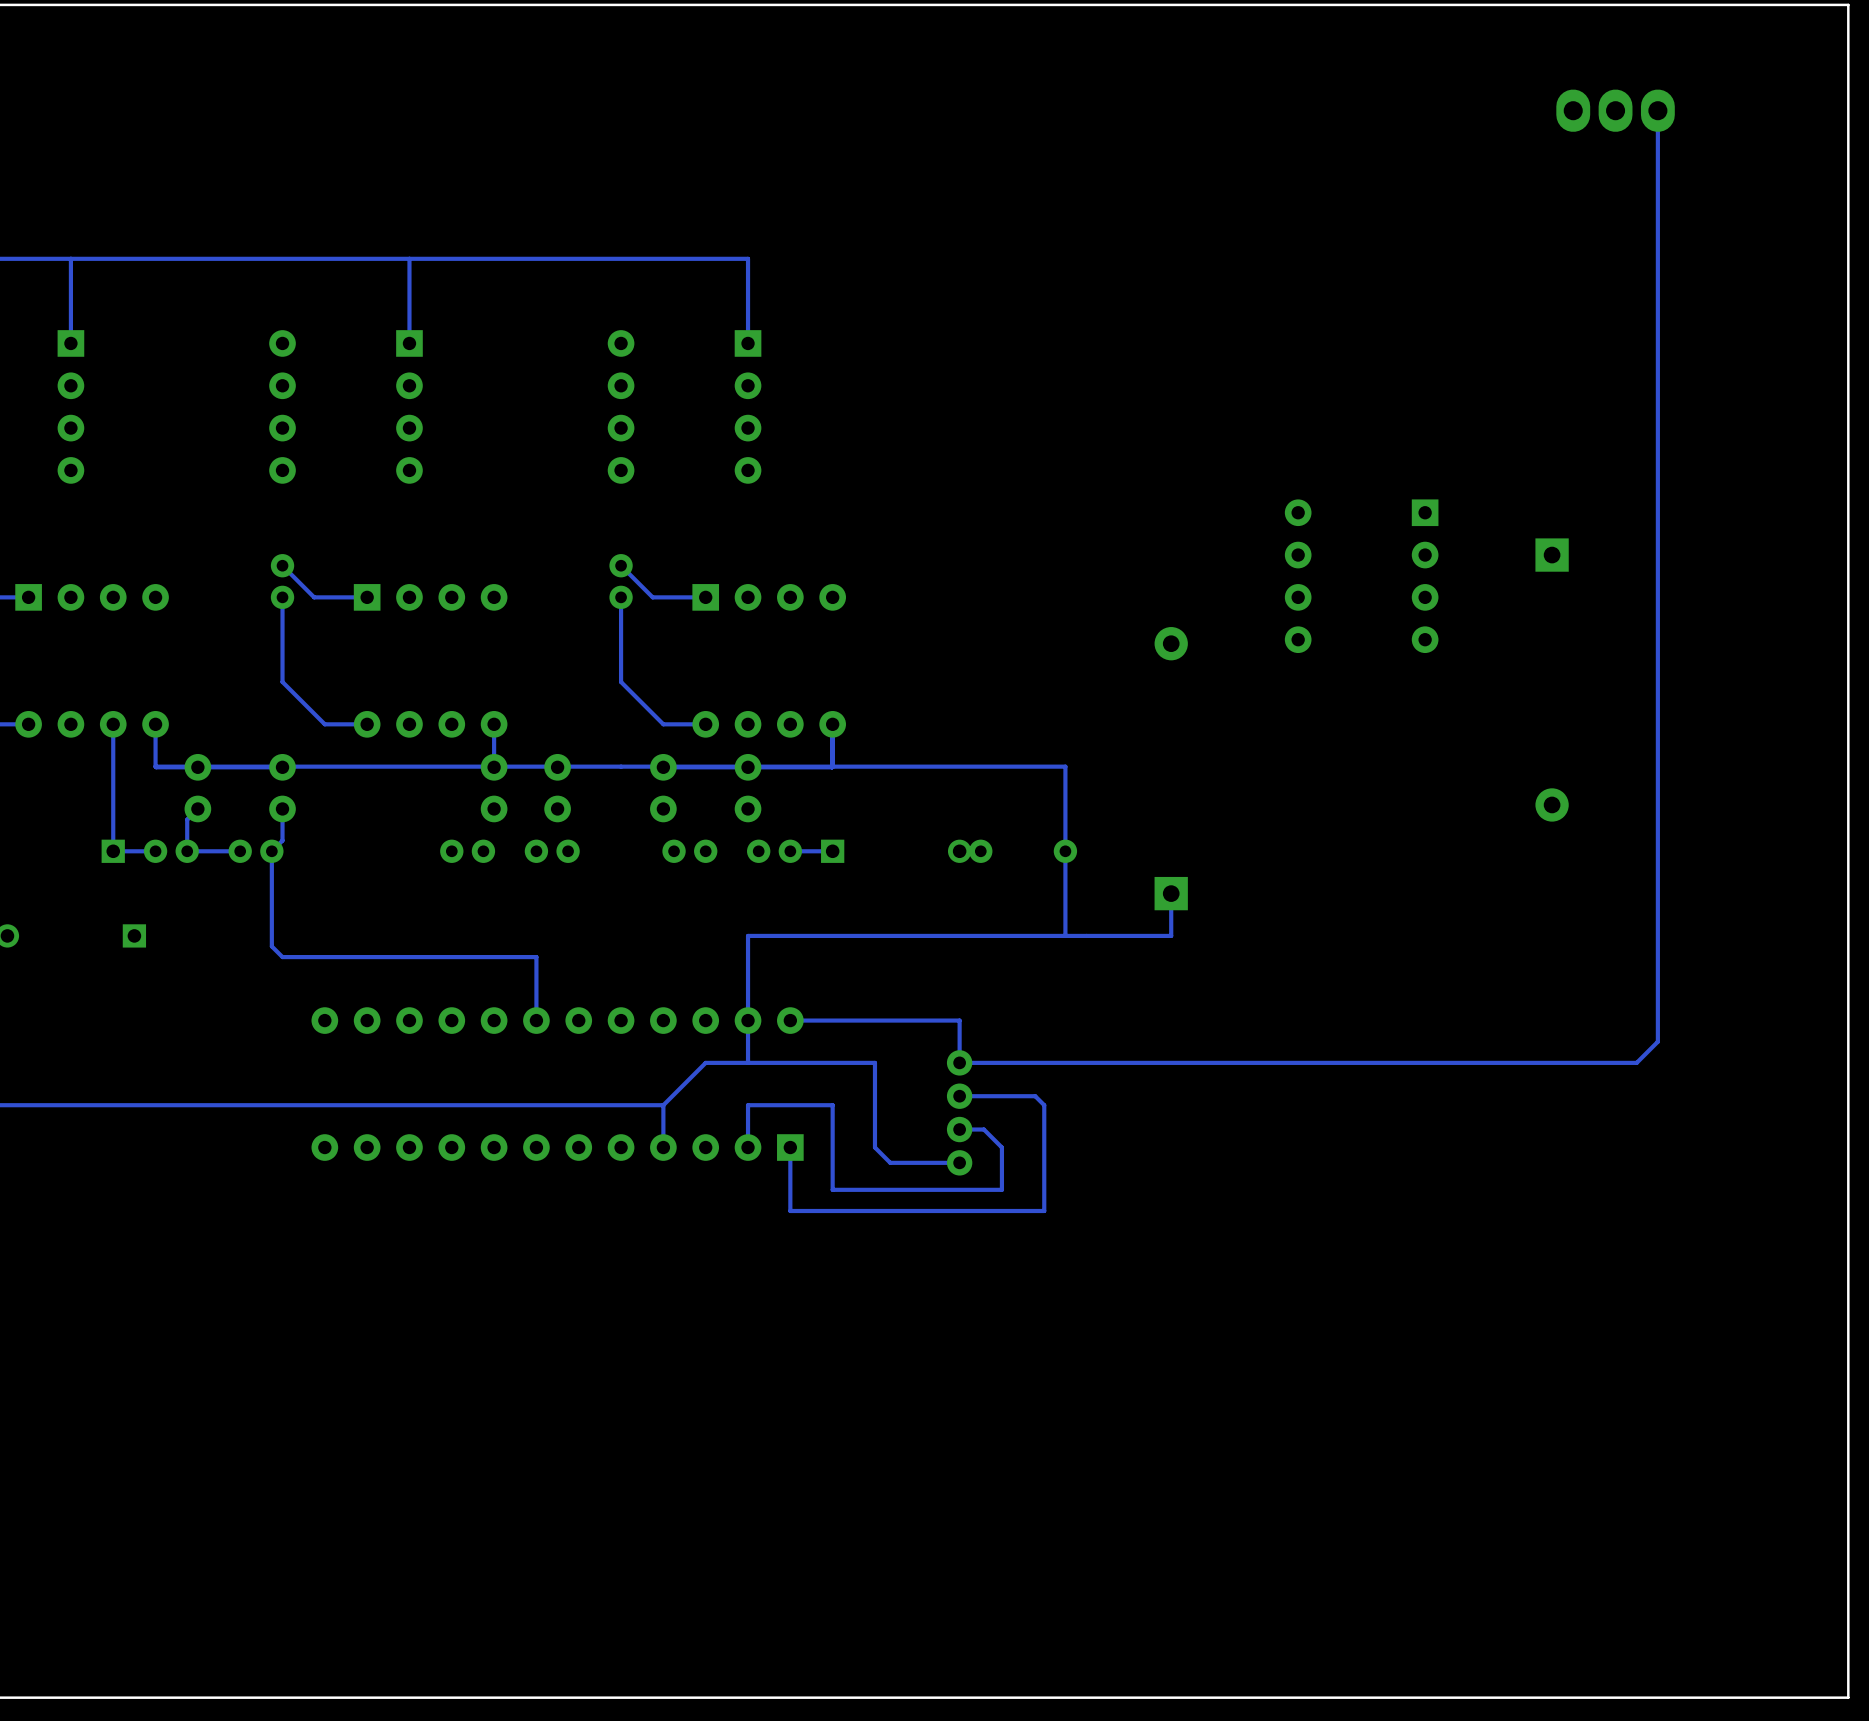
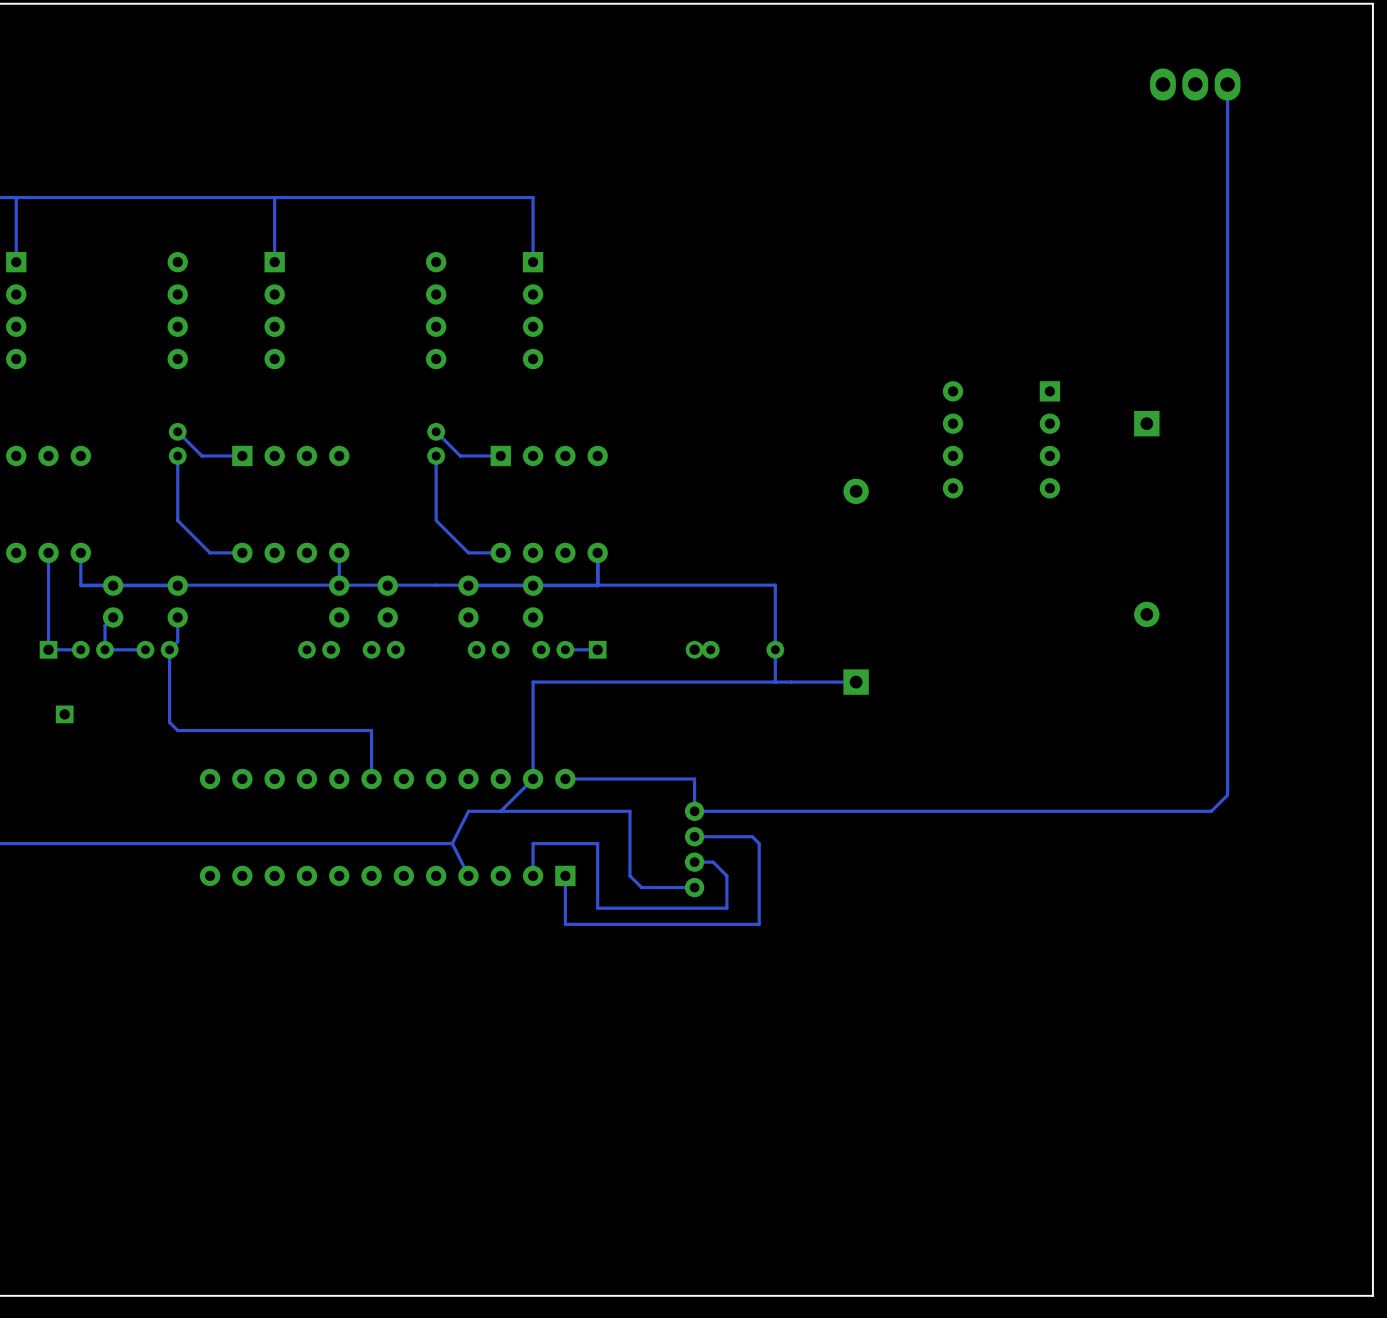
track: (1065, 893) (1065, 935) -> none
track: (1171, 893) (1171, 935) (748, 935) -> (856, 682) (533, 682) (533, 714)
track: (748, 1020) (748, 1062) -> (533, 779) (500, 811) (468, 811) (452, 843) (468, 875)
track: (705, 1062) (663, 1105) -> none
track: (663, 1105) (663, 1147) -> none
track: (663, 1105) (642, 1105) -> none

